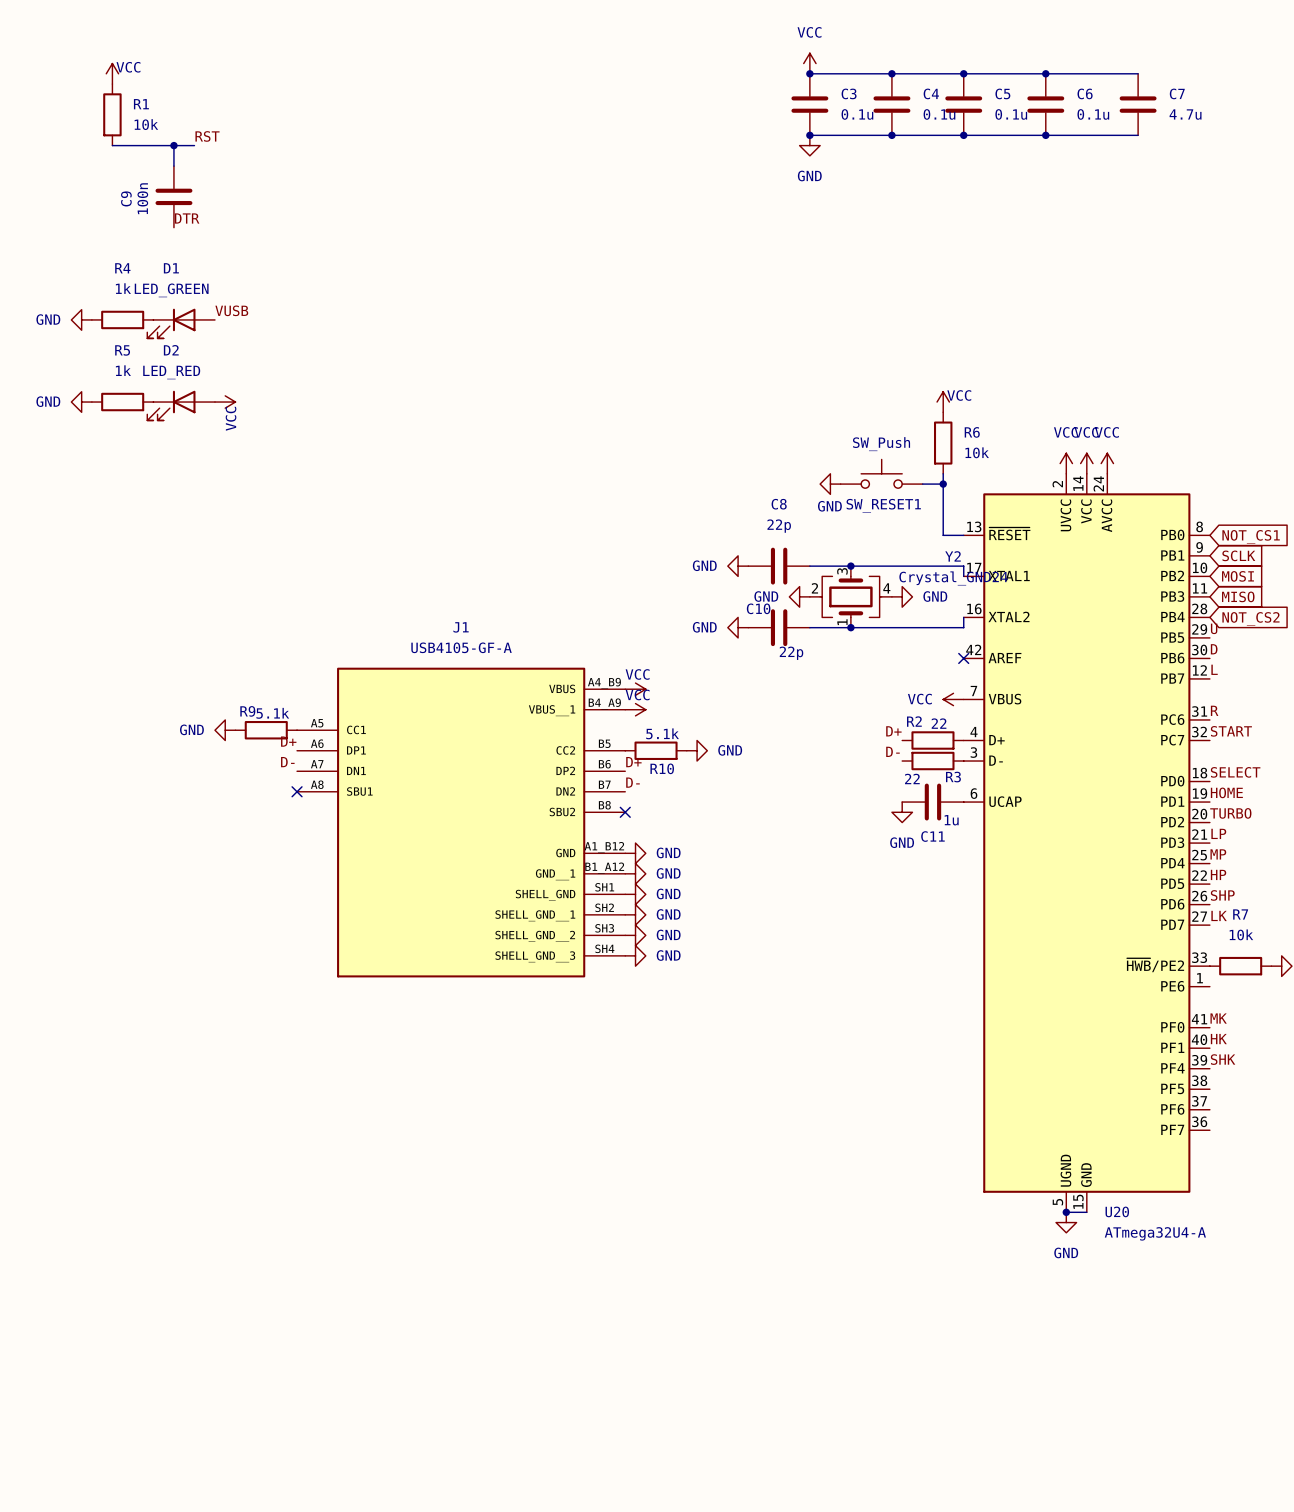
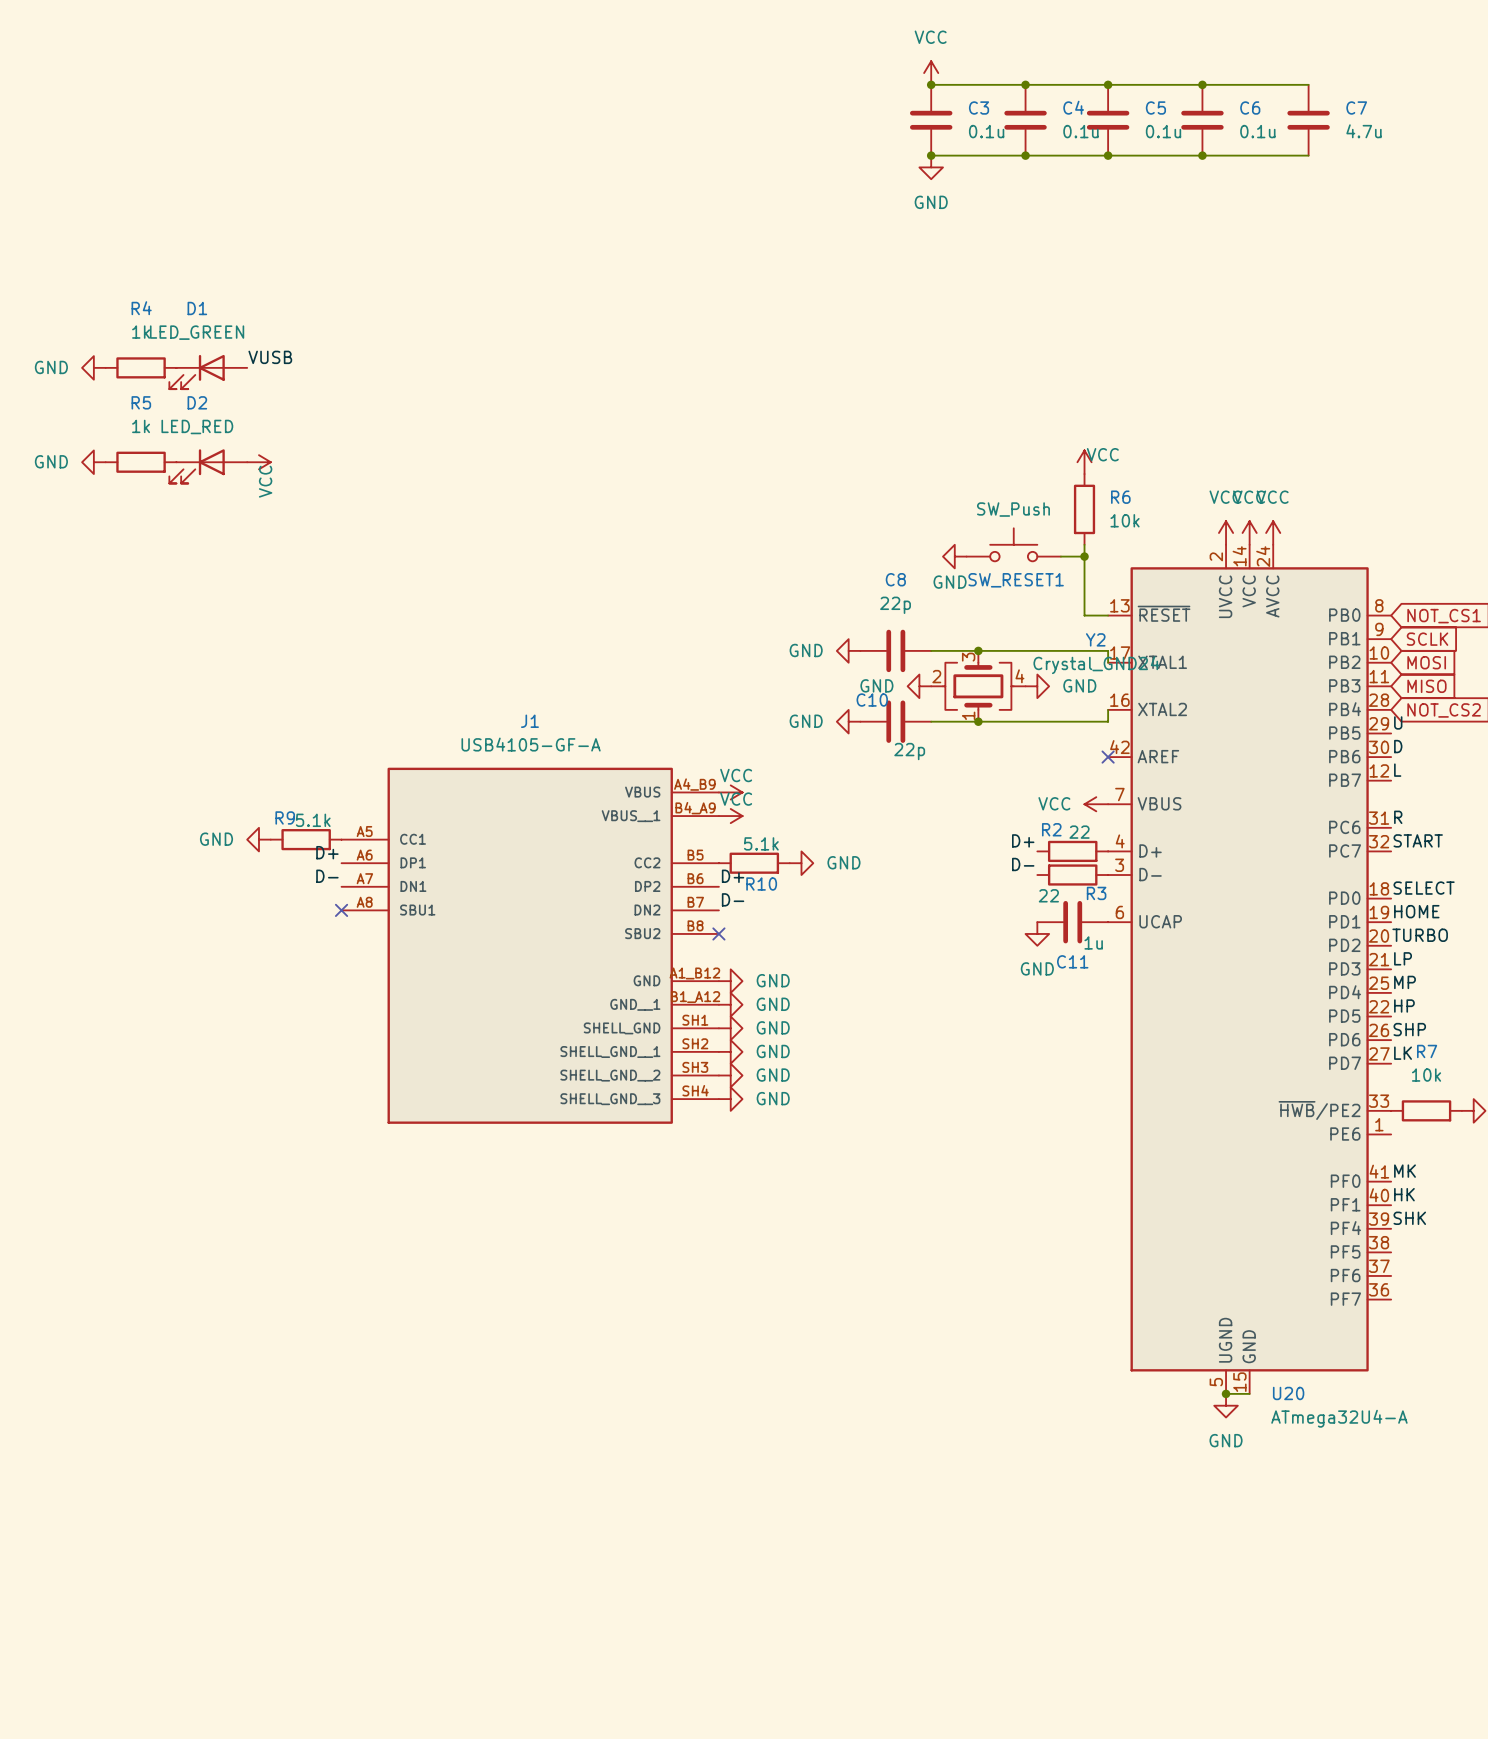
power symbol: VCC (112, 73) -> none
R1: 10k (112, 114) -> none
label: RST (207, 136) -> none
wire: (112, 145) (194, 145) -> none
wire: (173, 145) (173, 166) -> none
junction: (173, 145) -> none
C9: 100n (173, 196) -> none
label: DTR (187, 218) -> none

